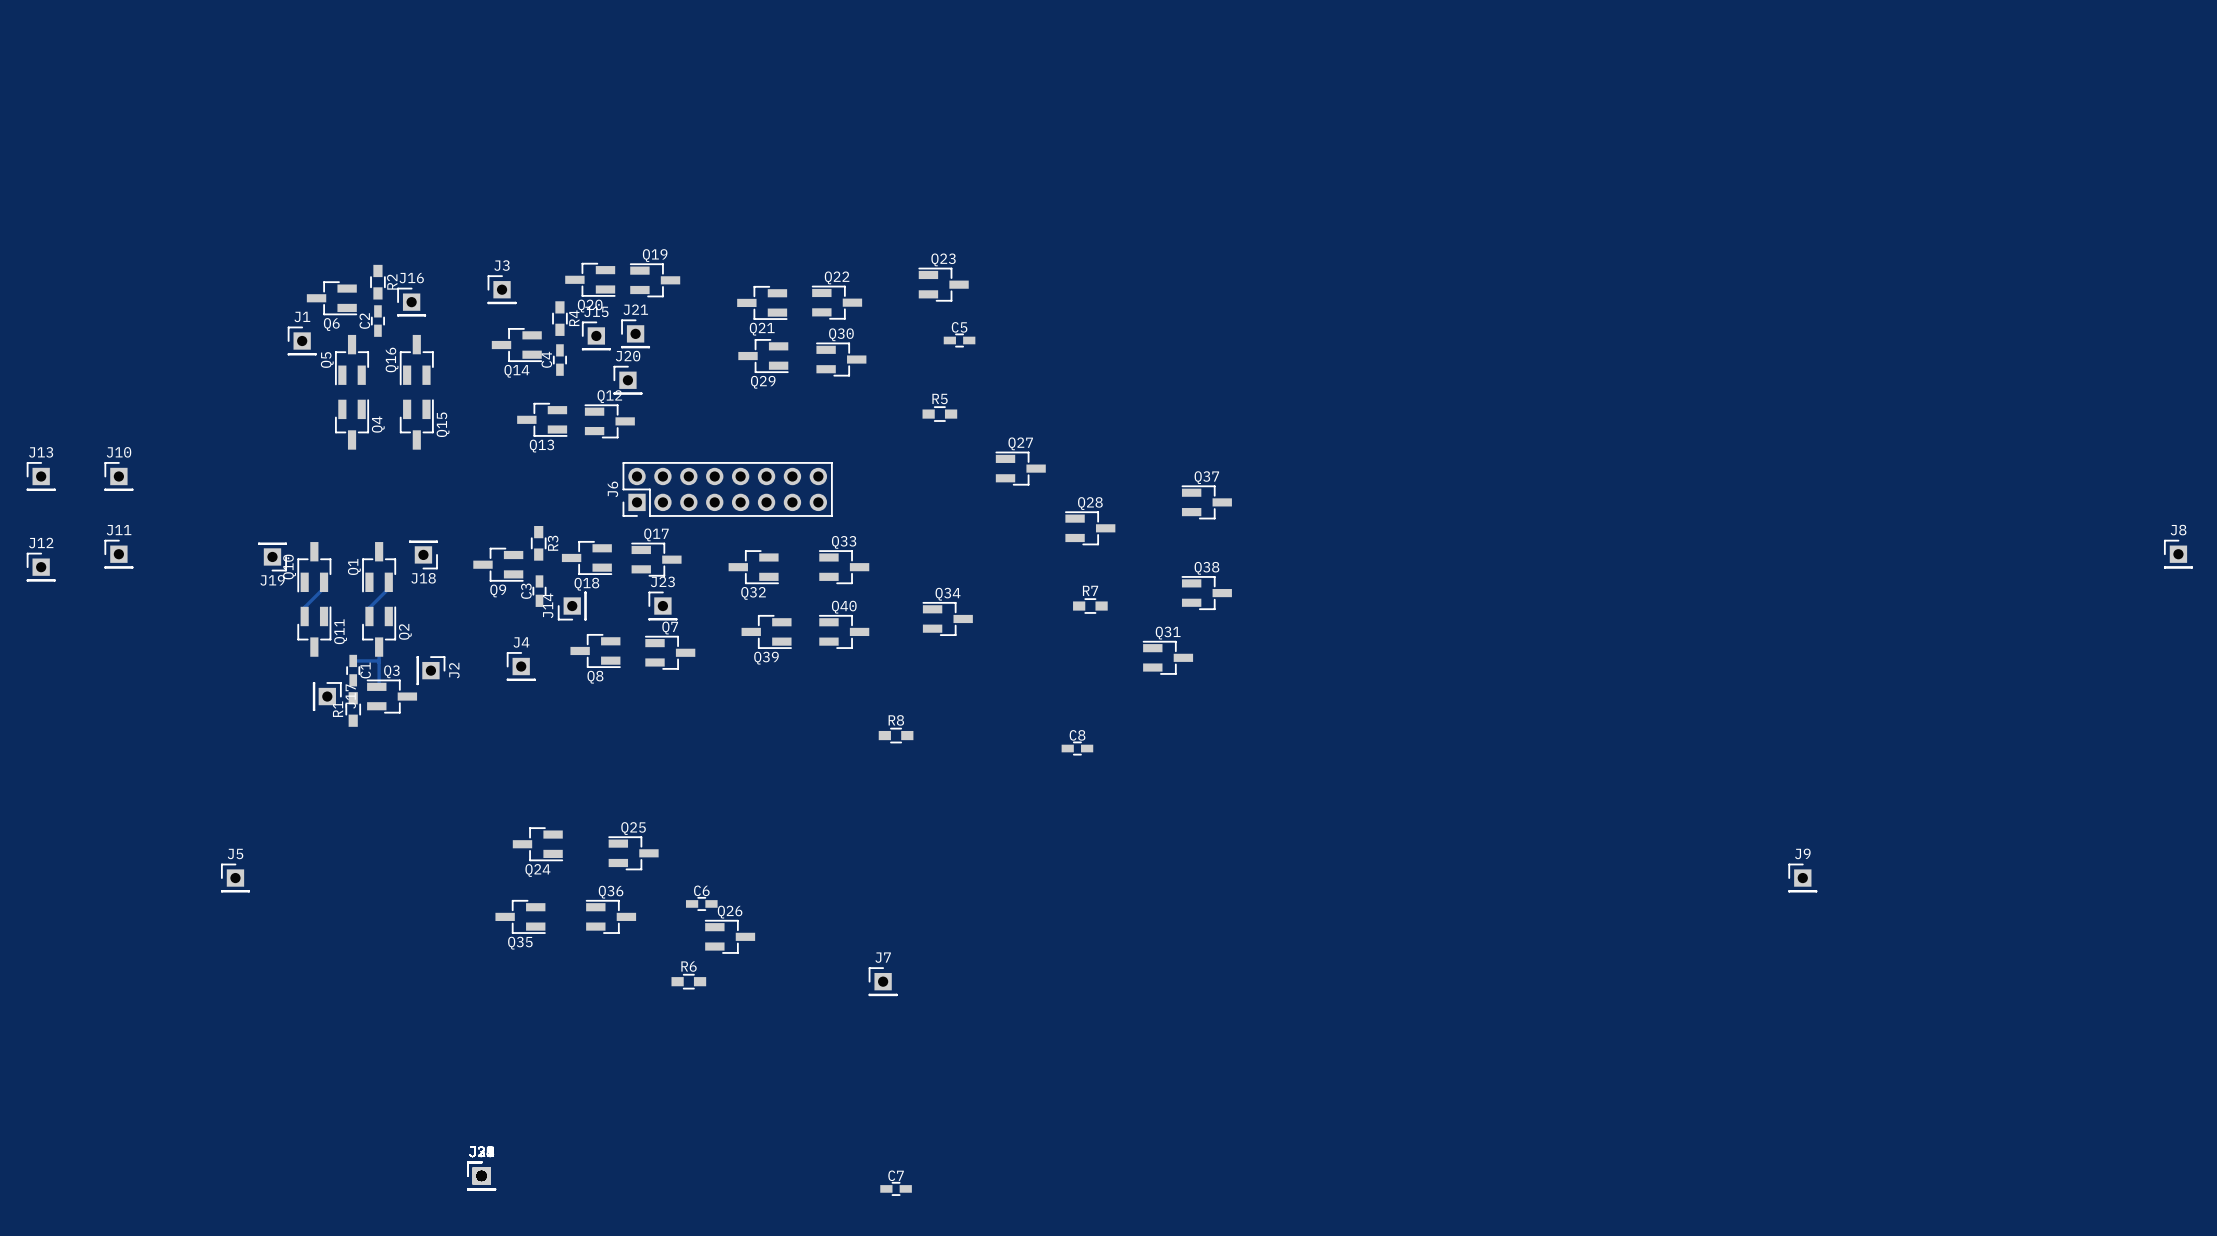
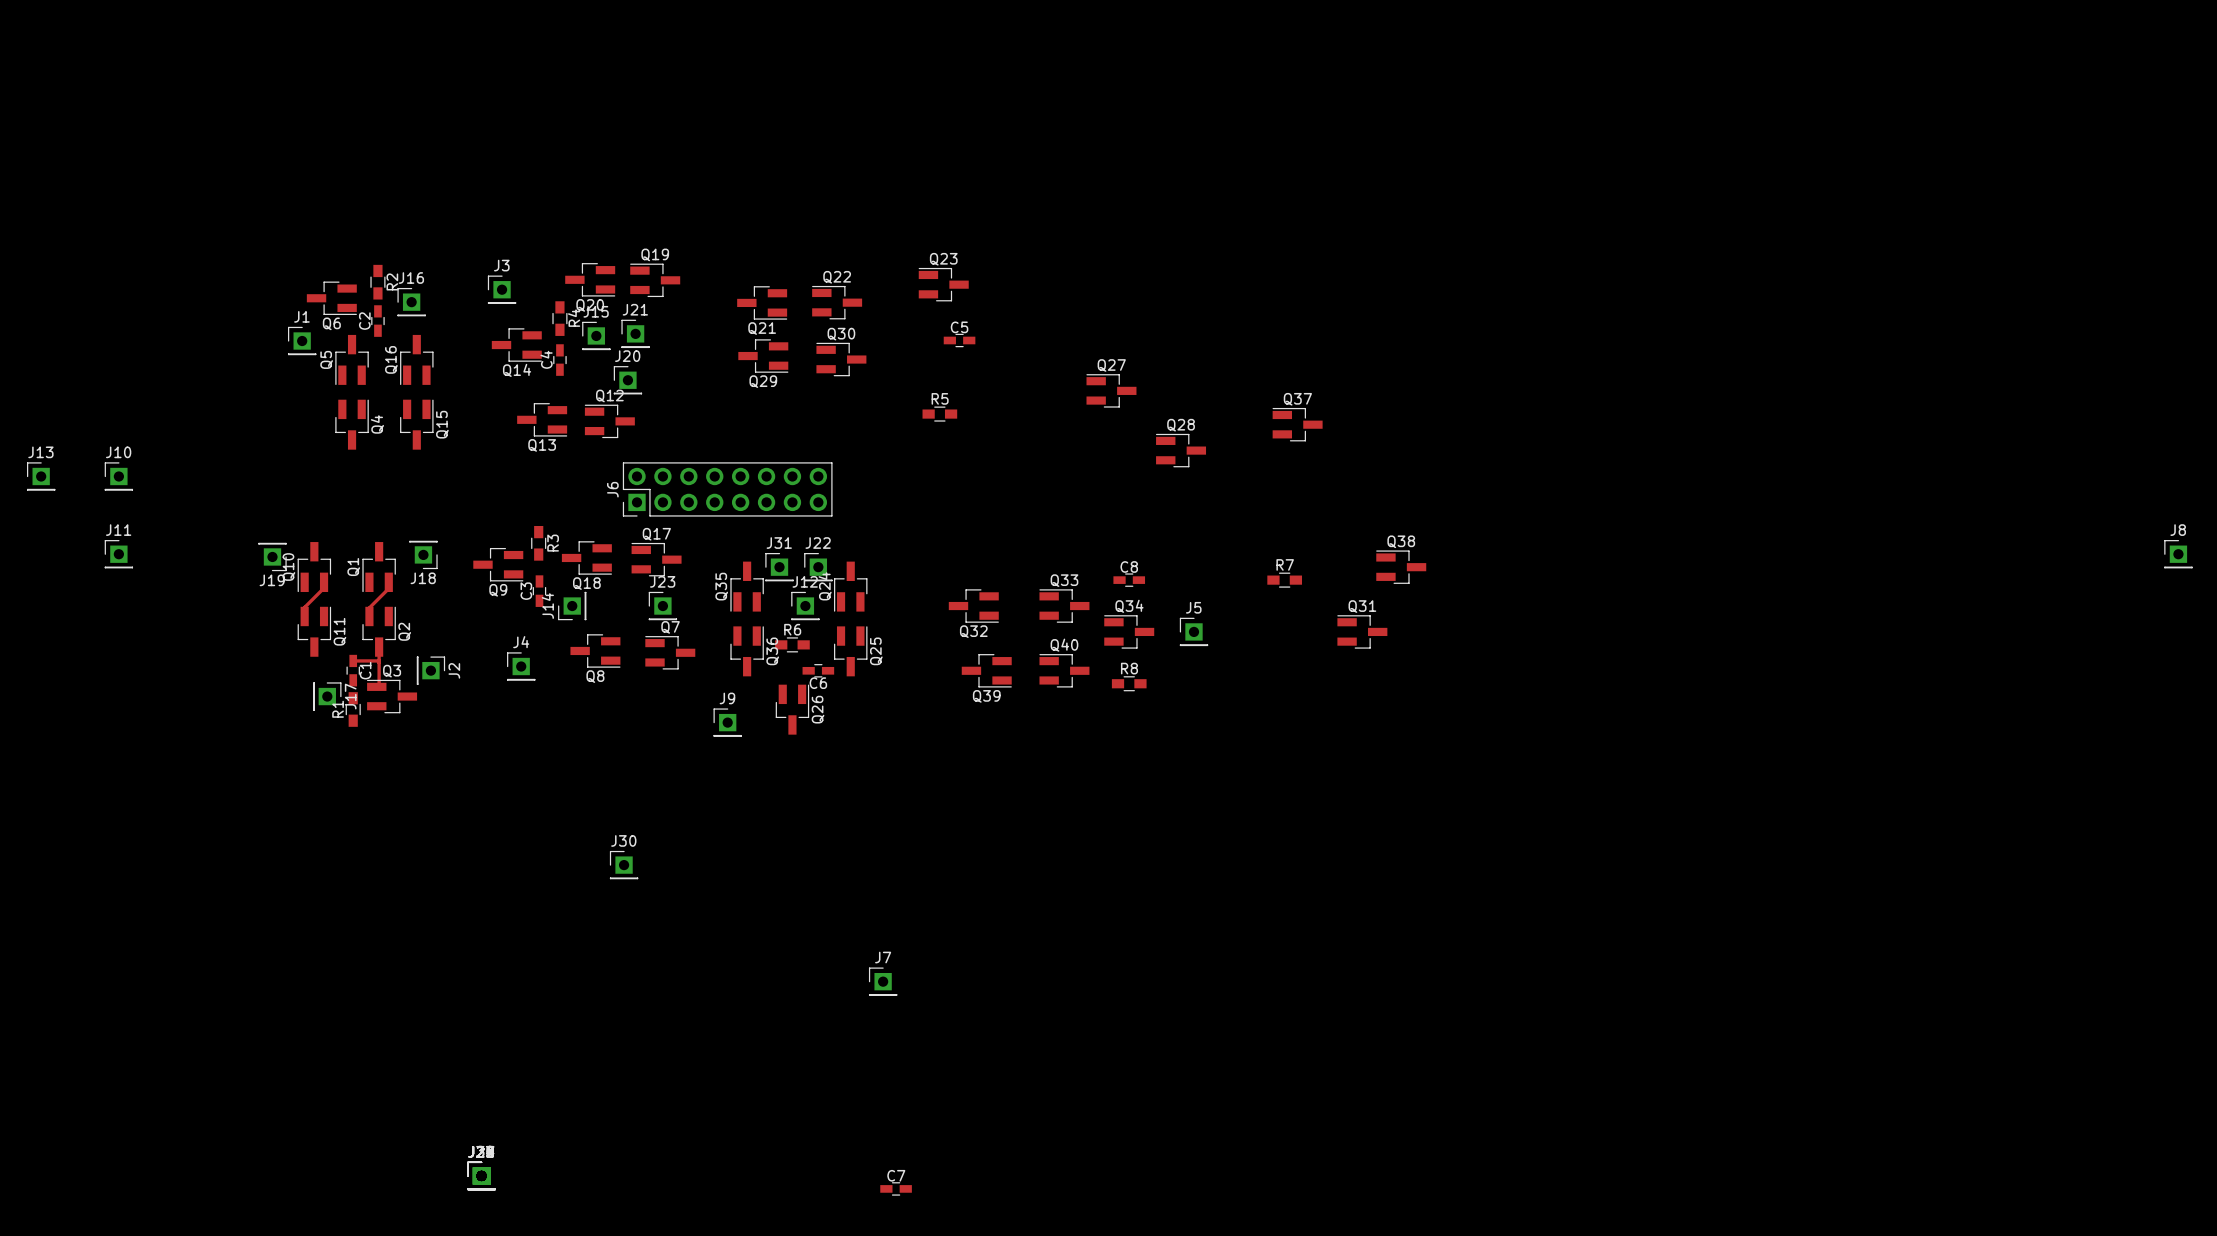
Q27 position: (1020, 468) -> (1111, 390)
Q37 position: (1206, 502) -> (1297, 424)
Q28 position: (1090, 528) -> (1180, 450)
J12 position: (41, 567) -> (805, 606)
Q32 position: (753, 567) -> (973, 606)
Q33 position: (844, 567) -> (1064, 606)
Q38 position: (1206, 593) -> (1401, 567)
R7 position: (1090, 606) -> (1284, 580)
Q34 position: (947, 618) -> (1129, 631)
Q39 position: (766, 631) -> (986, 670)
Q40 position: (844, 631) -> (1064, 670)
Q31 position: (1168, 657) -> (1362, 631)
R8 position: (896, 735) -> (1129, 683)
C8 position: (1077, 748) -> (1129, 580)
Q24 rotation: 0° (537, 844) -> 90° clockwise (850, 586)
Q24 position: (537, 844) -> (850, 586)
Q25 rotation: 0° (633, 853) -> 90° clockwise (850, 651)
Q25 position: (633, 853) -> (850, 651)
J5 position: (235, 878) -> (1194, 631)
J9 position: (1802, 878) -> (727, 722)
C6 name position: C6 (701, 890) -> C6 (818, 683)
C6 position: (701, 903) -> (818, 670)
Q35 rotation: 0° (520, 916) -> 90° clockwise (747, 586)
Q35 position: (520, 916) -> (747, 586)
Q36 rotation: 0° (611, 916) -> 90° clockwise (747, 651)
Q36 position: (611, 916) -> (747, 651)
Q26 rotation: 0° (730, 936) -> 90° clockwise (792, 709)
Q26 position: (730, 936) -> (792, 709)
R6 position: (688, 981) -> (792, 644)
J22 position: (481, 1175) -> (818, 567)
J30 position: (481, 1175) -> (624, 865)
J31 position: (481, 1175) -> (779, 567)

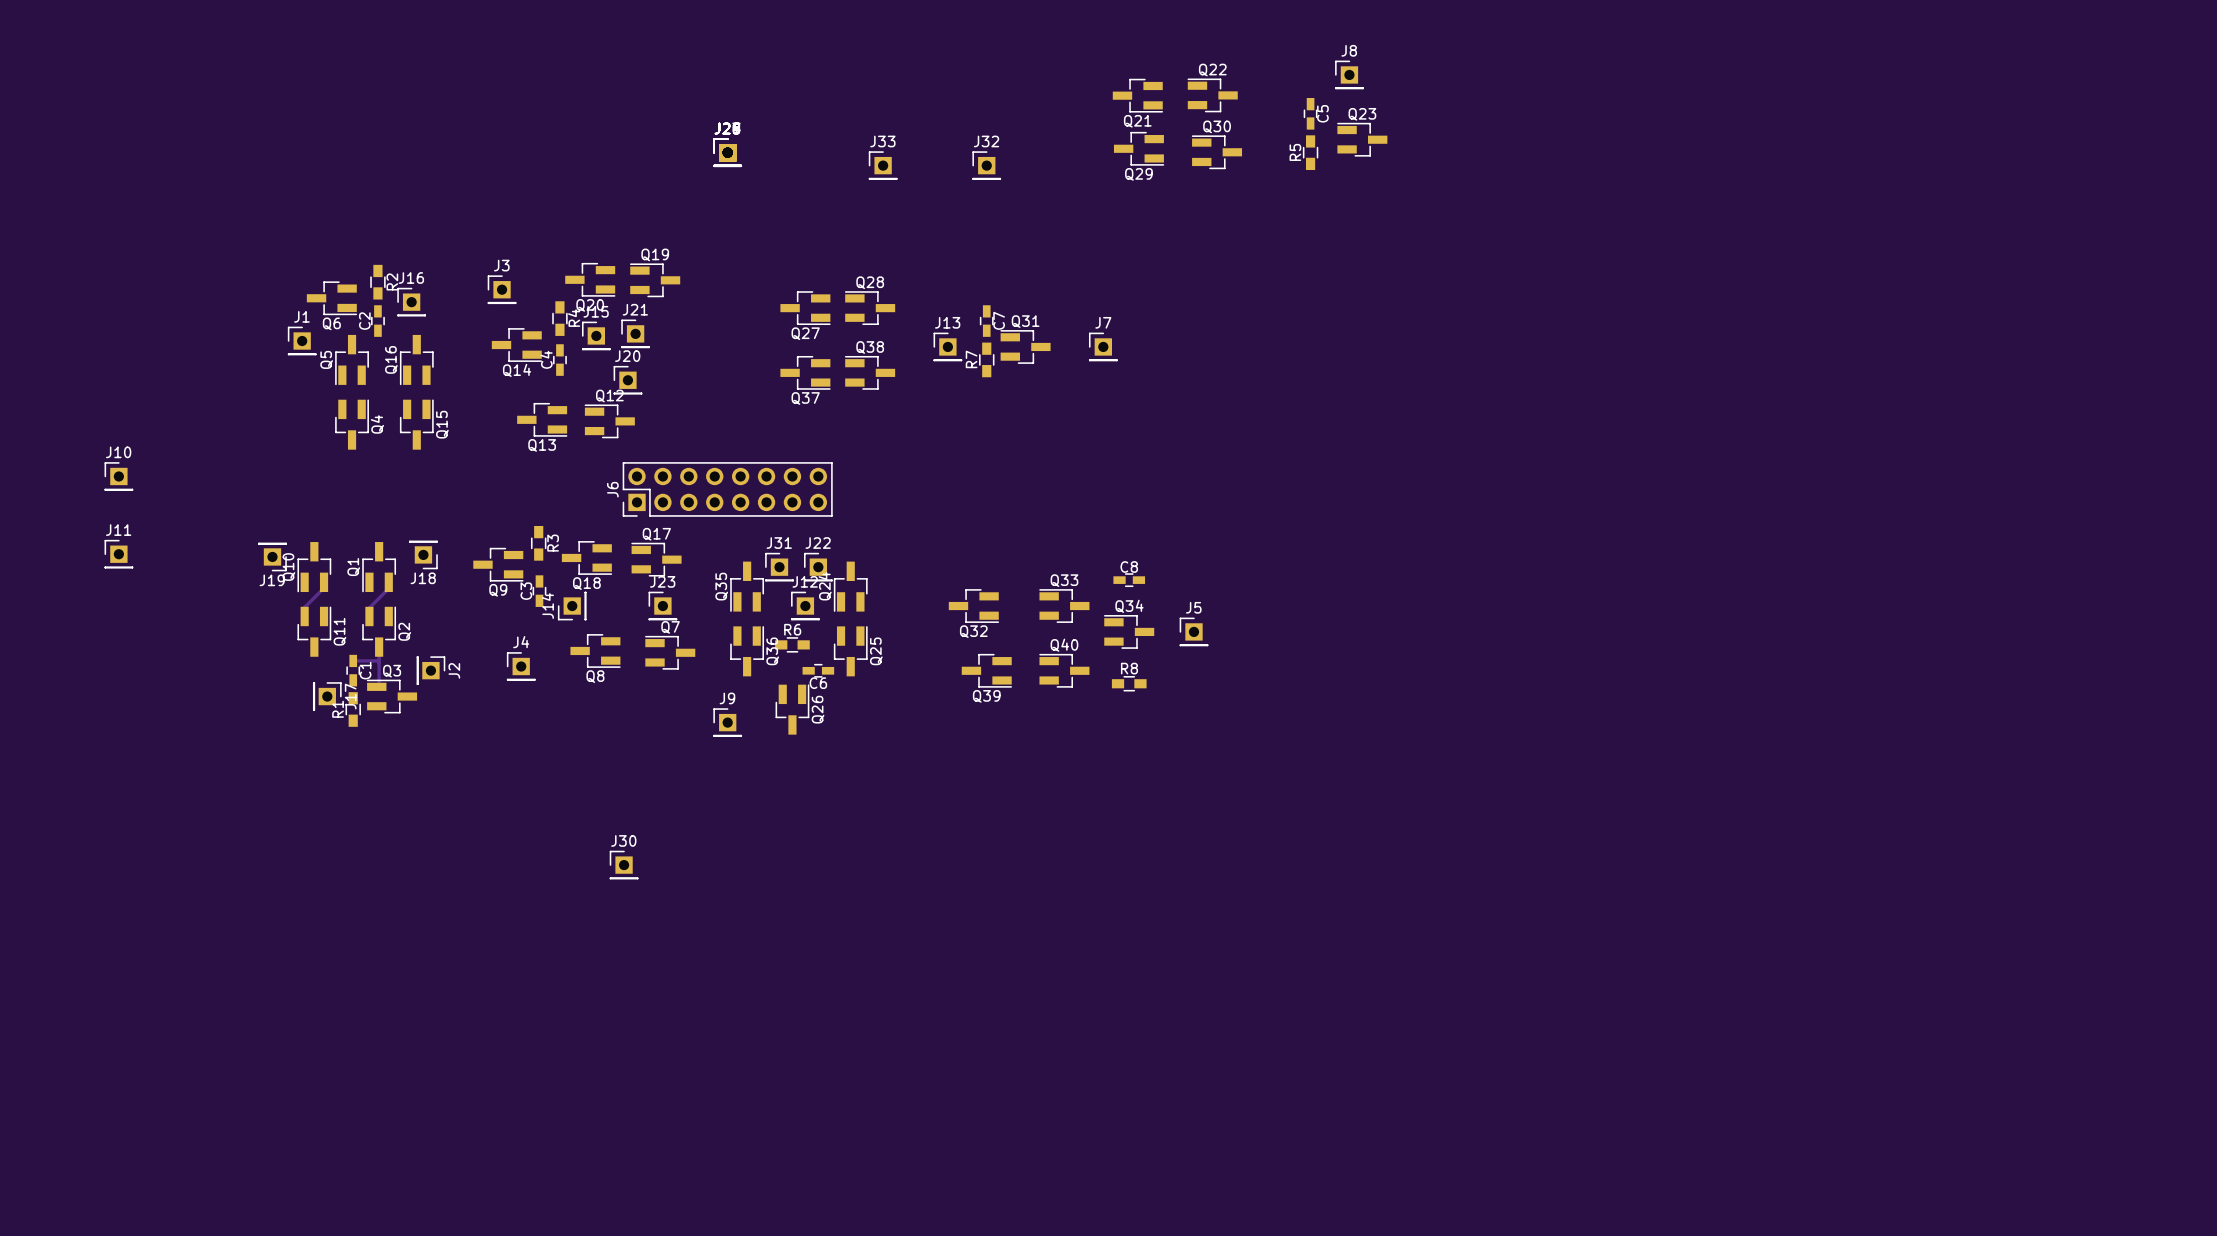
Q23 position: (943, 284) -> (1362, 139)
Q21 position: (762, 302) -> (1137, 95)
Q22 position: (837, 302) -> (1212, 95)
C5 rotation: 0° (959, 340) -> 90° clockwise (1310, 113)
C5 position: (959, 340) -> (1310, 113)
Q29 position: (763, 356) -> (1139, 148)
Q30 position: (841, 359) -> (1217, 152)
Q27 rotation: 0° (1111, 390) -> 180° (805, 308)
Q27 position: (1111, 390) -> (805, 308)
R5 name position: R5 (940, 398) -> R5 (1295, 152)
R5 rotation: 0° (939, 414) -> 90° clockwise (1310, 152)
R5 position: (939, 414) -> (1310, 152)
Q37 rotation: 0° (1297, 424) -> 180° (805, 372)
Q37 position: (1297, 424) -> (805, 372)
Q28 position: (1180, 450) -> (870, 308)
J13 position: (41, 476) -> (947, 346)
J8 position: (2178, 554) -> (1349, 74)
R7 name position: R7 (1285, 564) -> R7 (971, 359)
Q38 position: (1401, 567) -> (870, 372)
R7 rotation: 0° (1284, 580) -> 90° clockwise (986, 359)
R7 position: (1284, 580) -> (986, 359)
Q31 position: (1362, 631) -> (1025, 346)
J7 position: (883, 981) -> (1103, 346)
part position: (481, 1175) -> (727, 152)
part position: (481, 1175) -> (727, 152)
part position: (481, 1175) -> (727, 152)
part position: (481, 1175) -> (727, 152)
part position: (481, 1175) -> (727, 152)
part position: (481, 1175) -> (727, 152)
J32 position: (481, 1175) -> (986, 165)
J33 position: (481, 1175) -> (883, 165)
C7 rotation: 0° (896, 1188) -> 90° clockwise (986, 321)
C7 position: (896, 1188) -> (986, 321)

